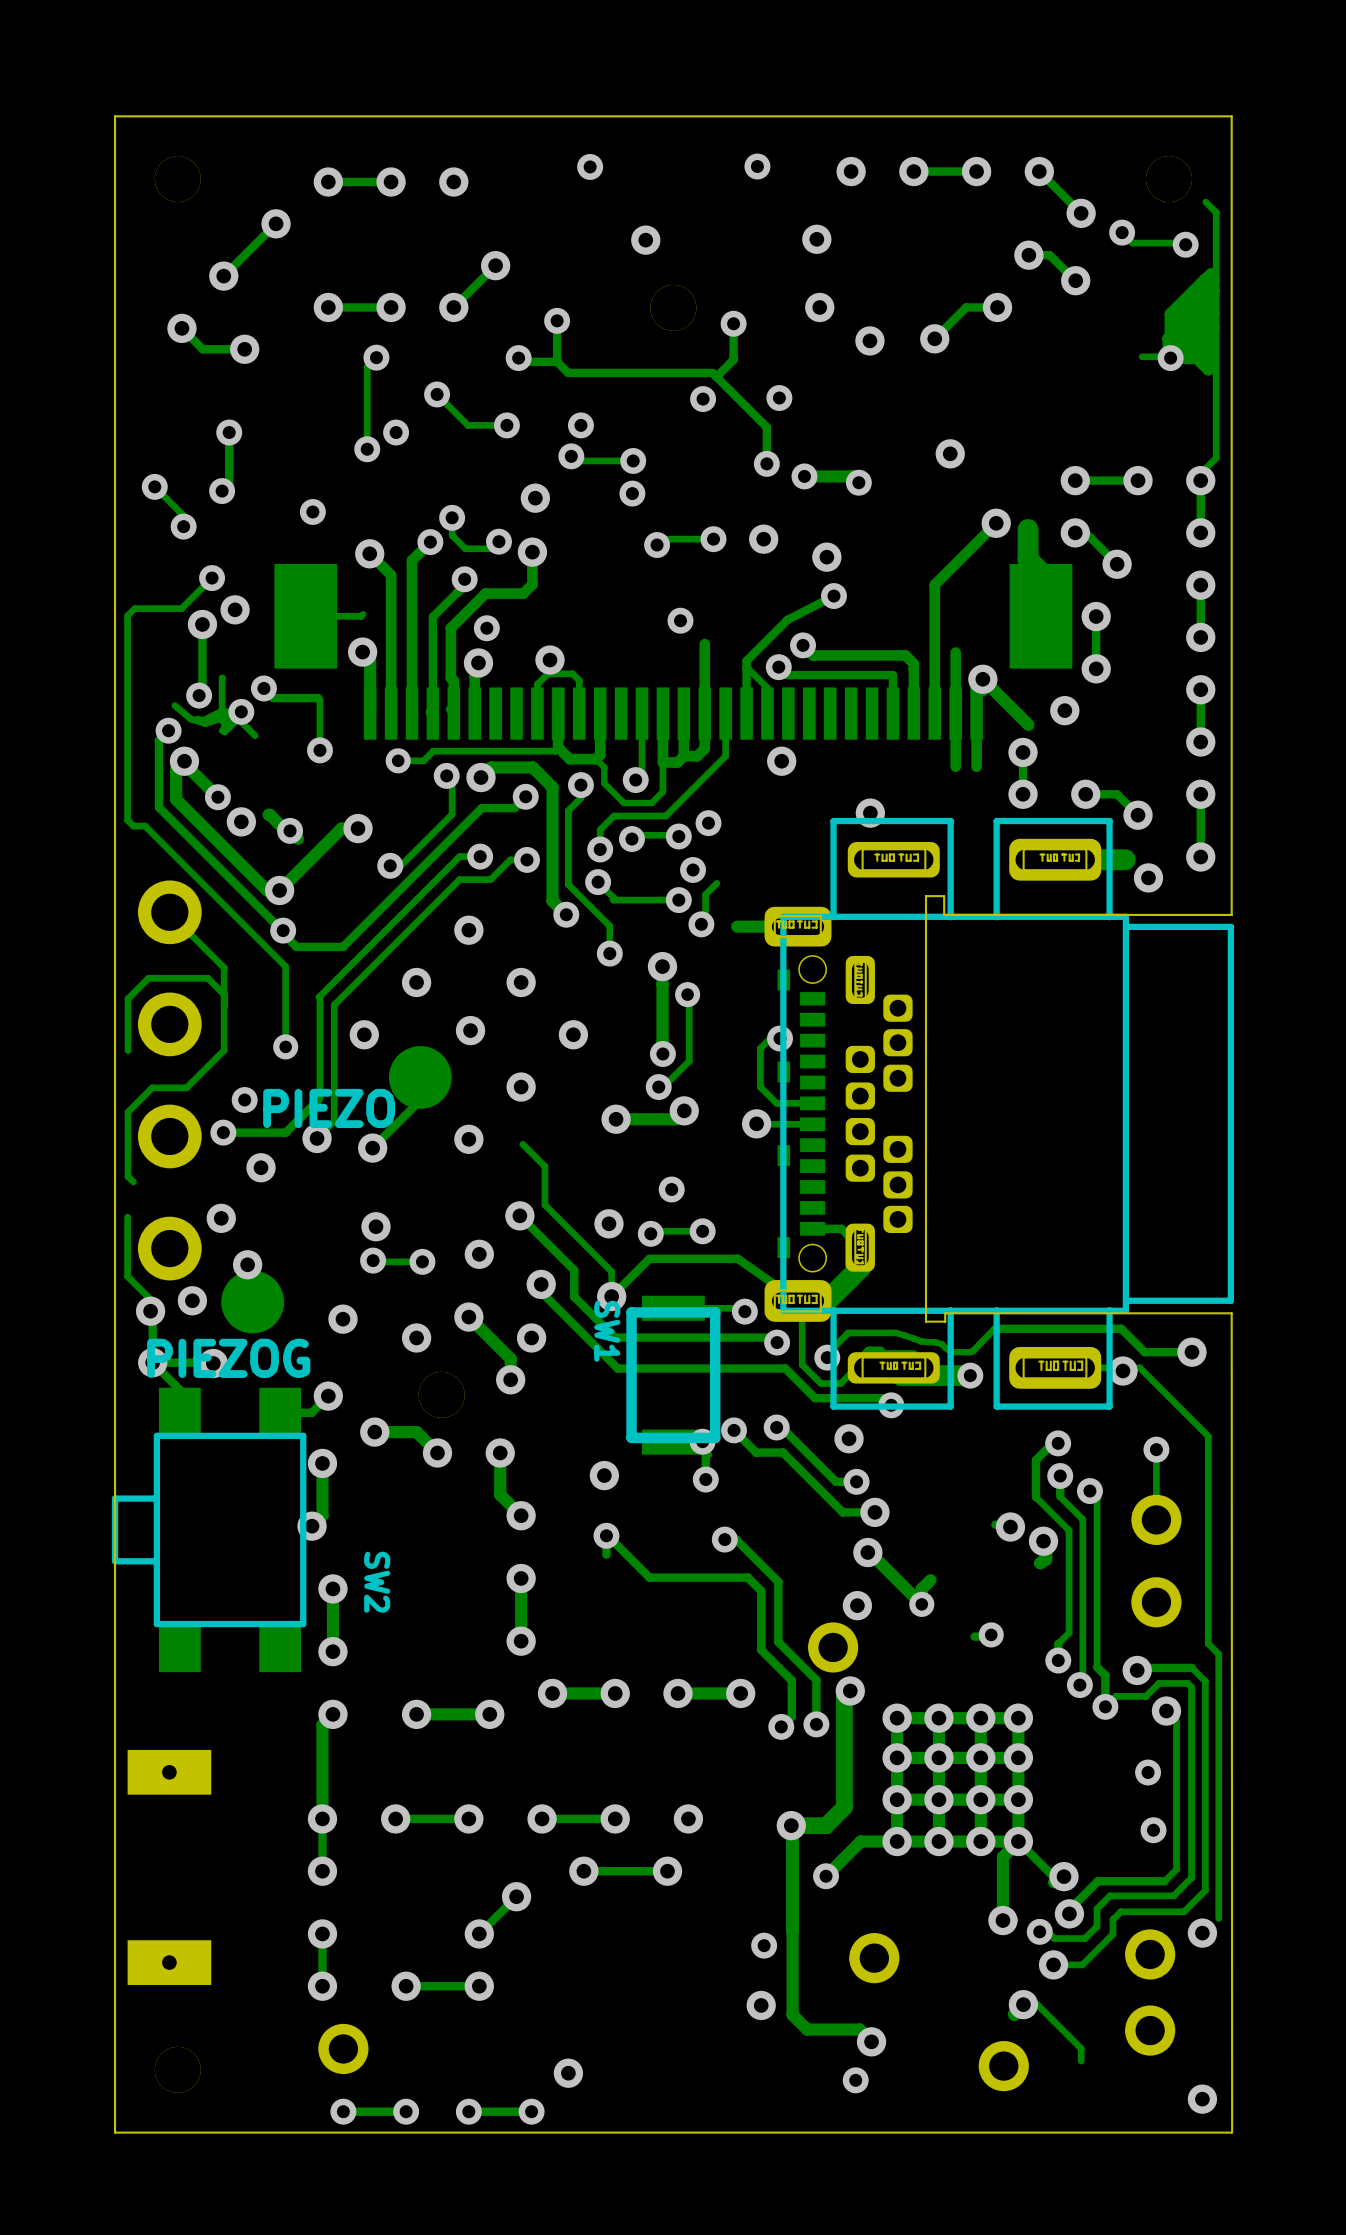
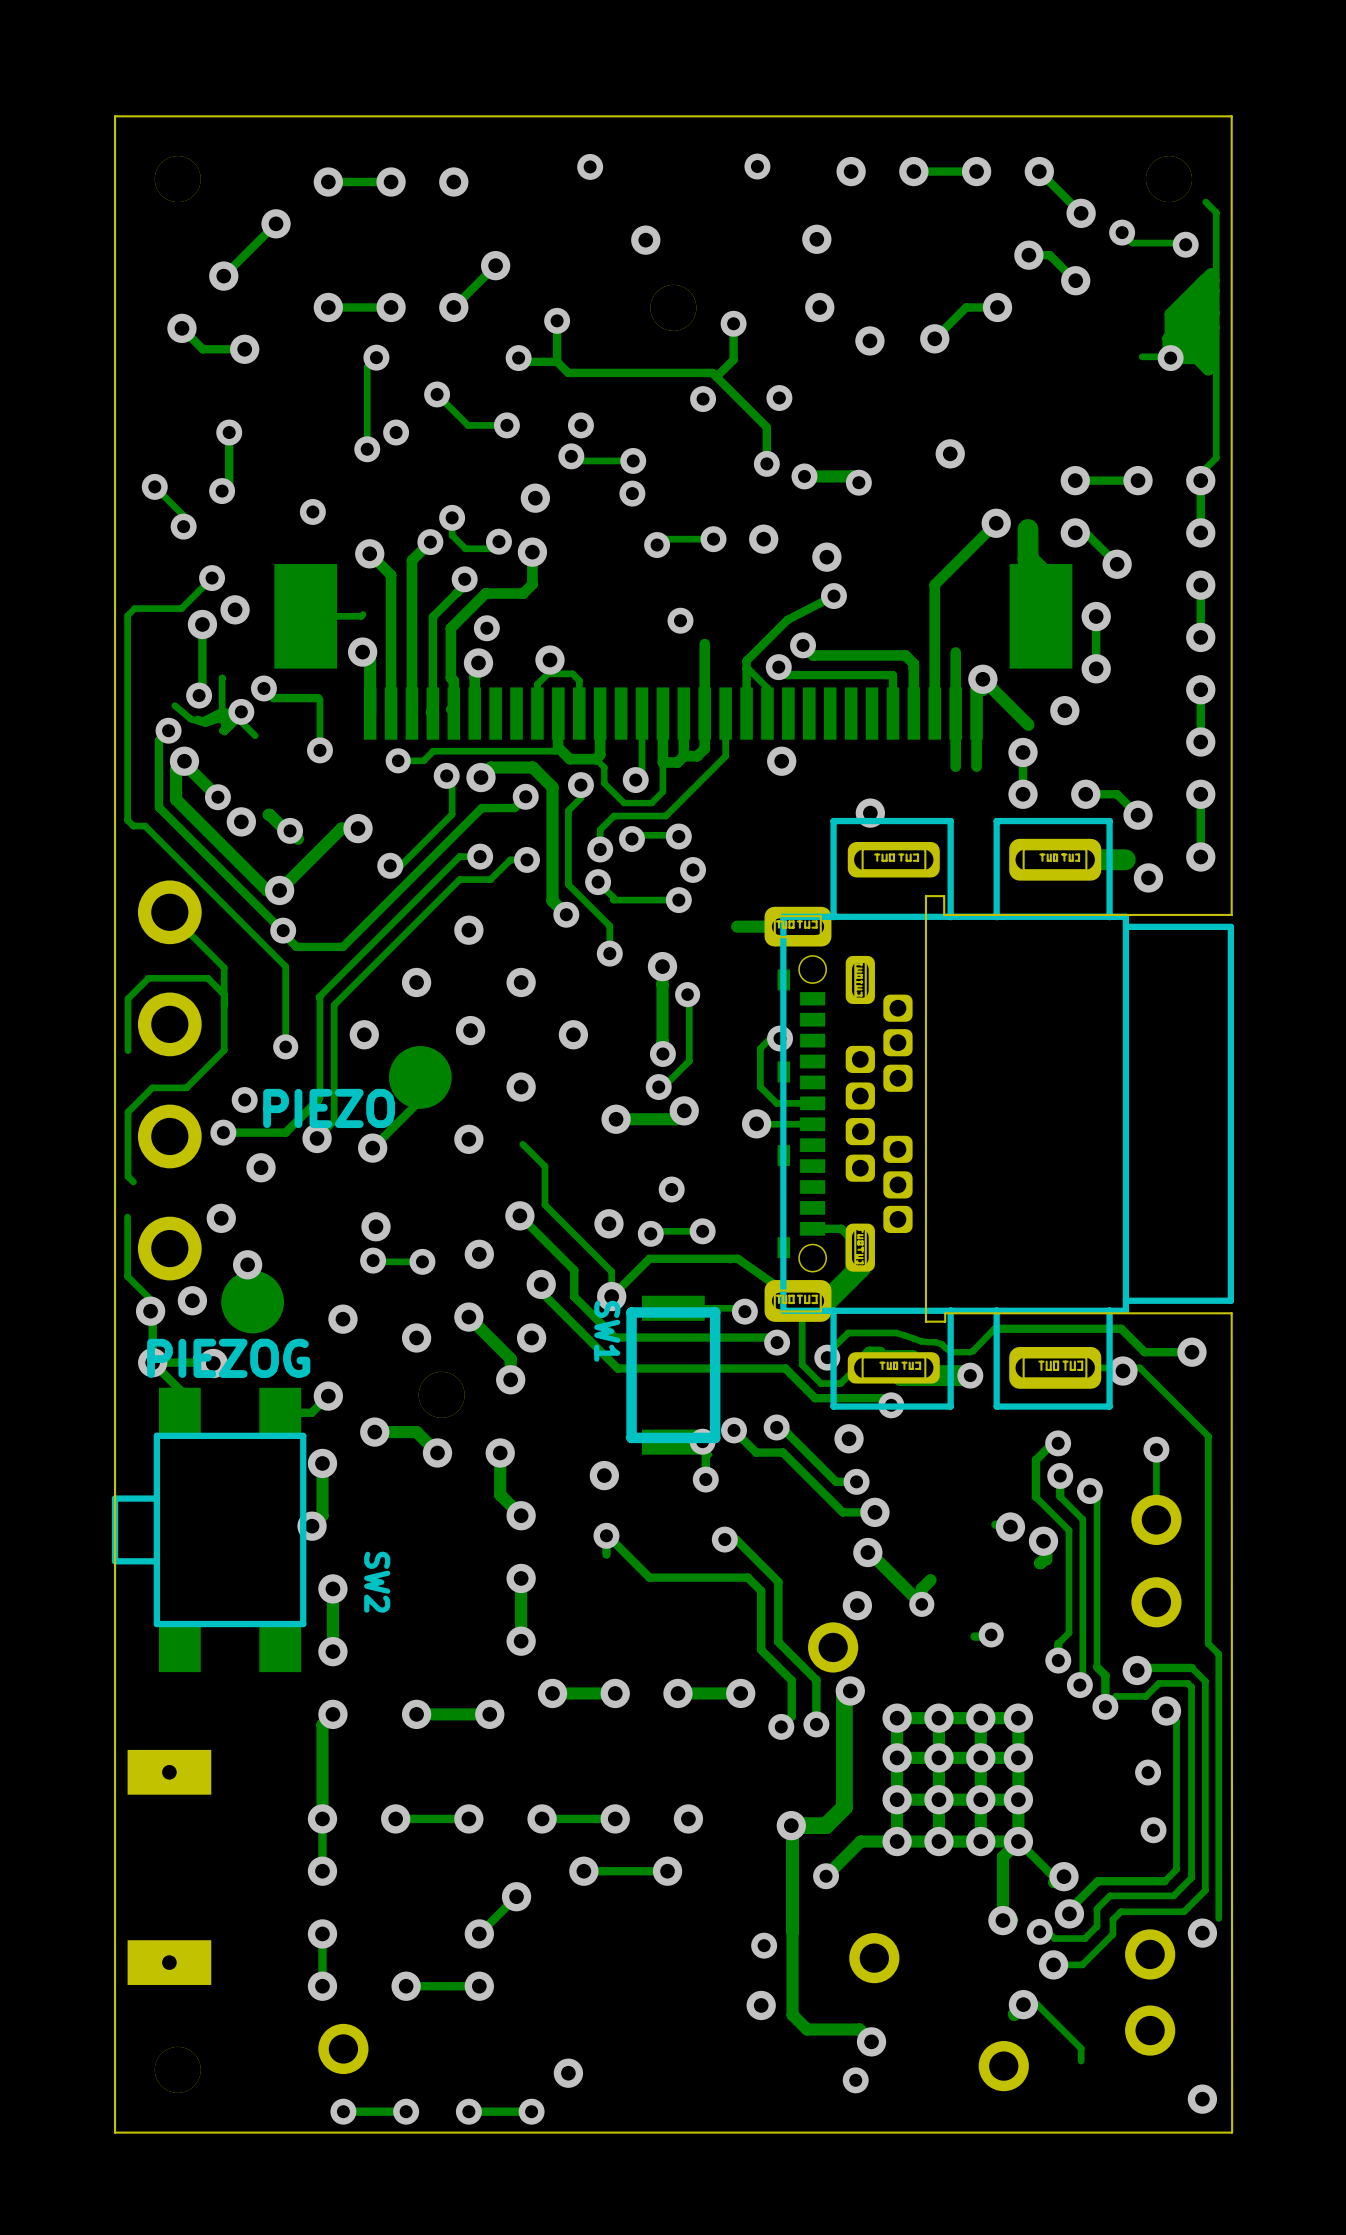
via: (708, 823) -> none
track: (716, 883) (705, 894) (705, 920) (701, 924) -> none
via: (701, 924) -> none

